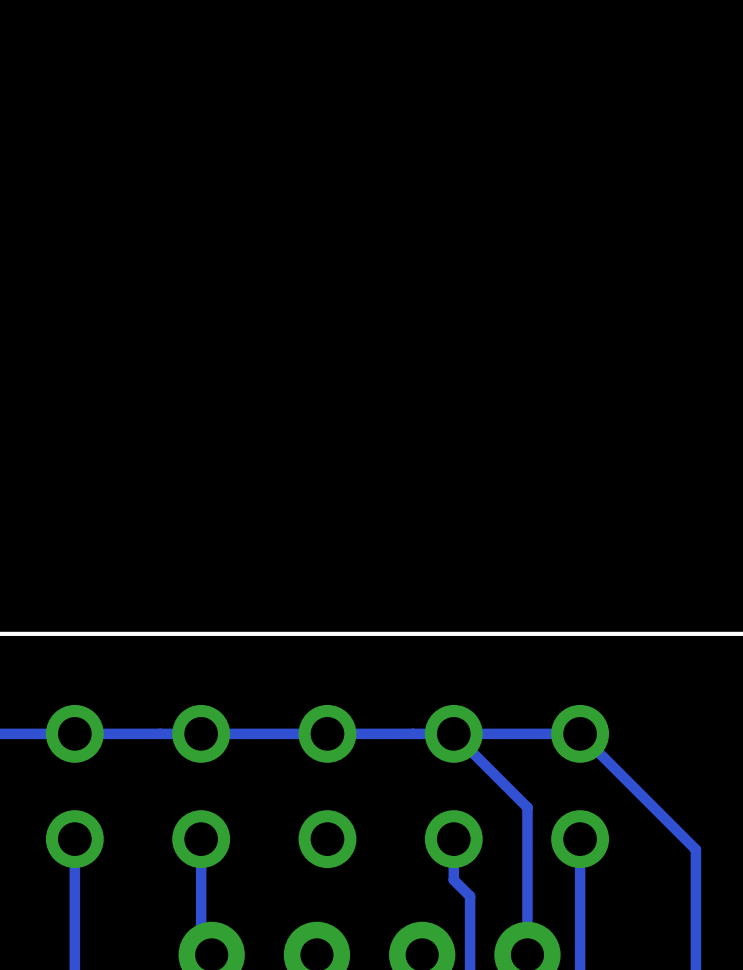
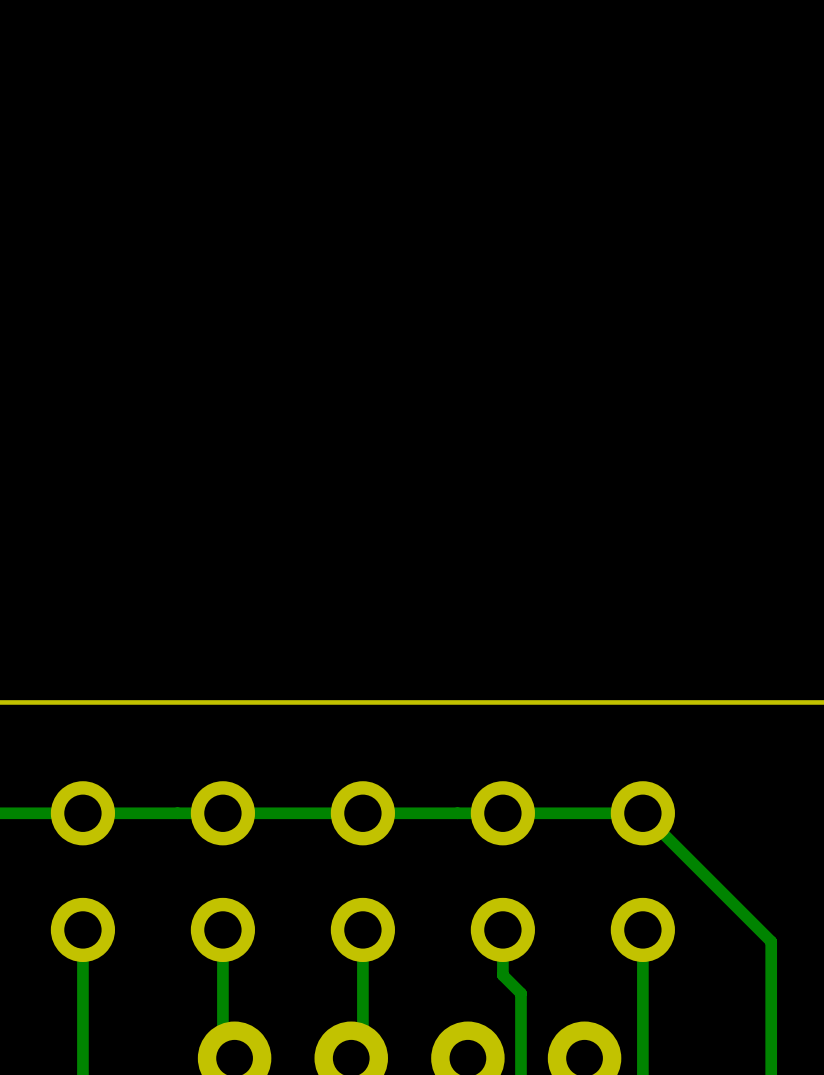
track: (453, 733) (527, 807) (527, 954) -> none
track: none -> (362, 929) (362, 1046) (351, 1058)

